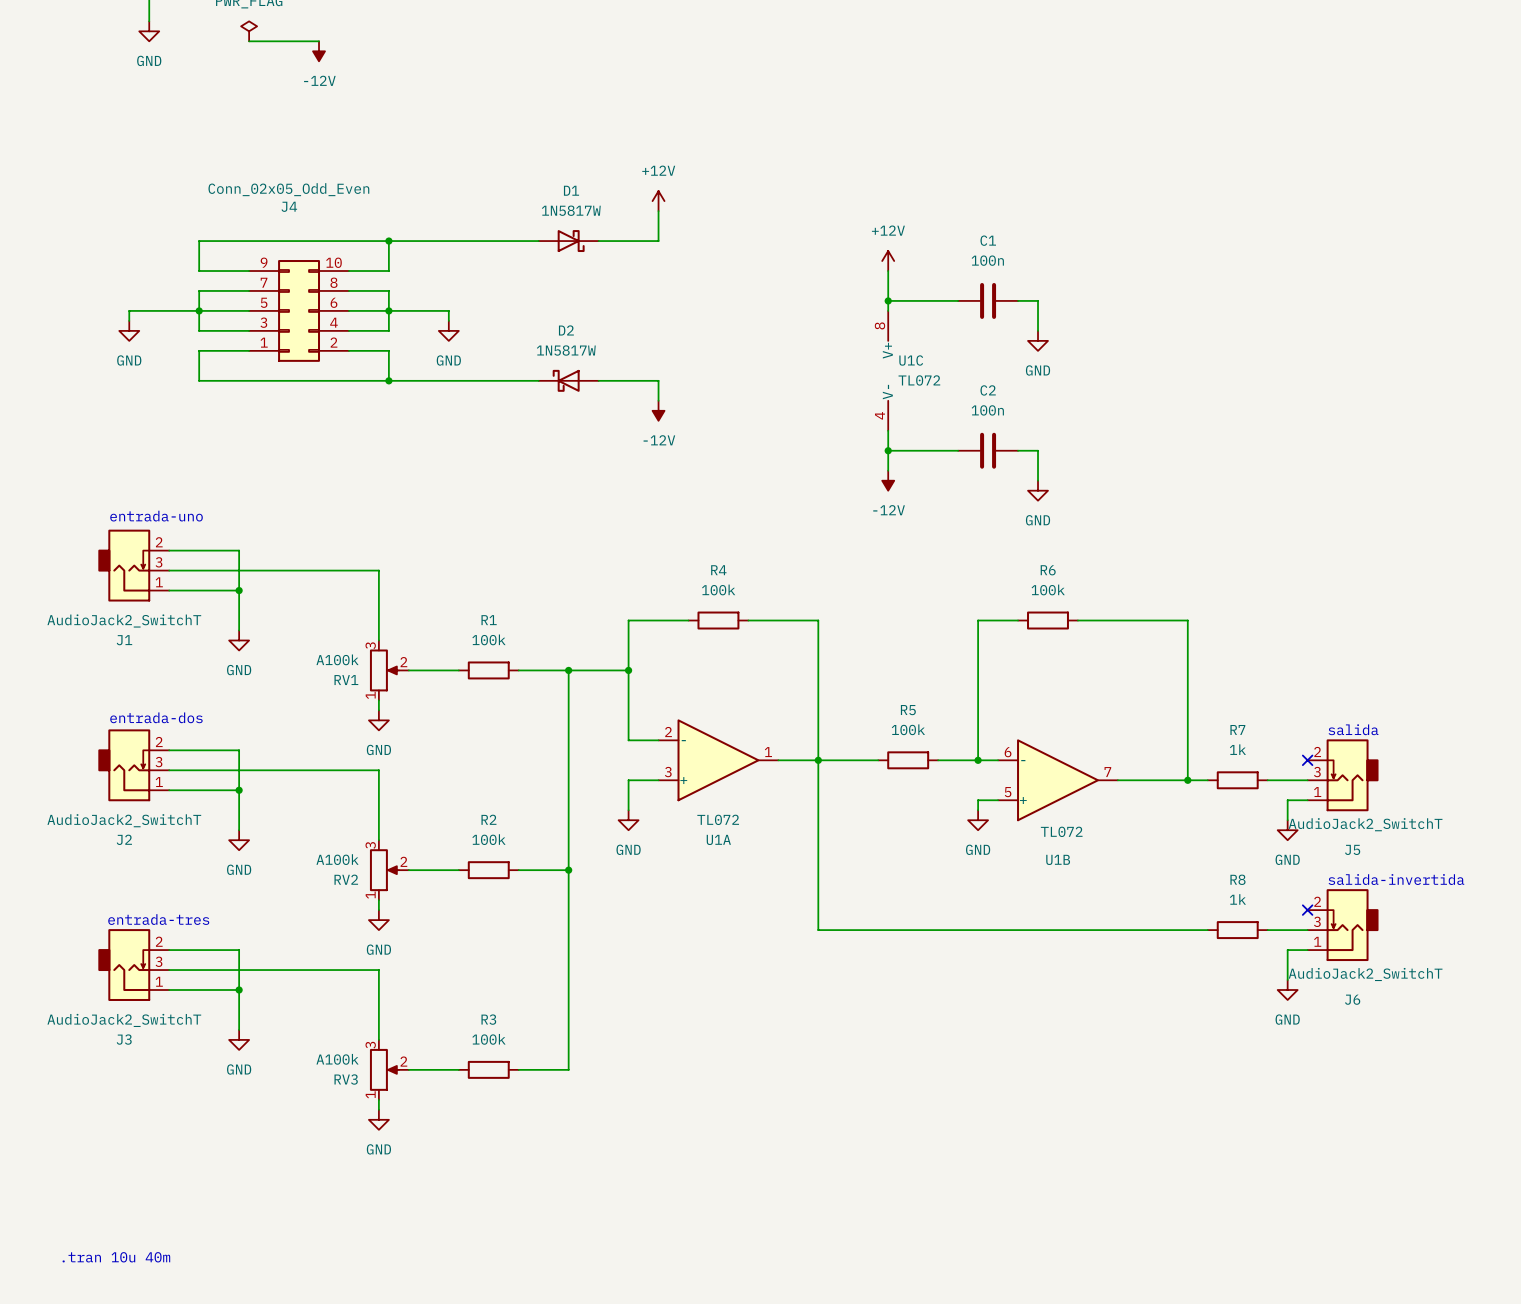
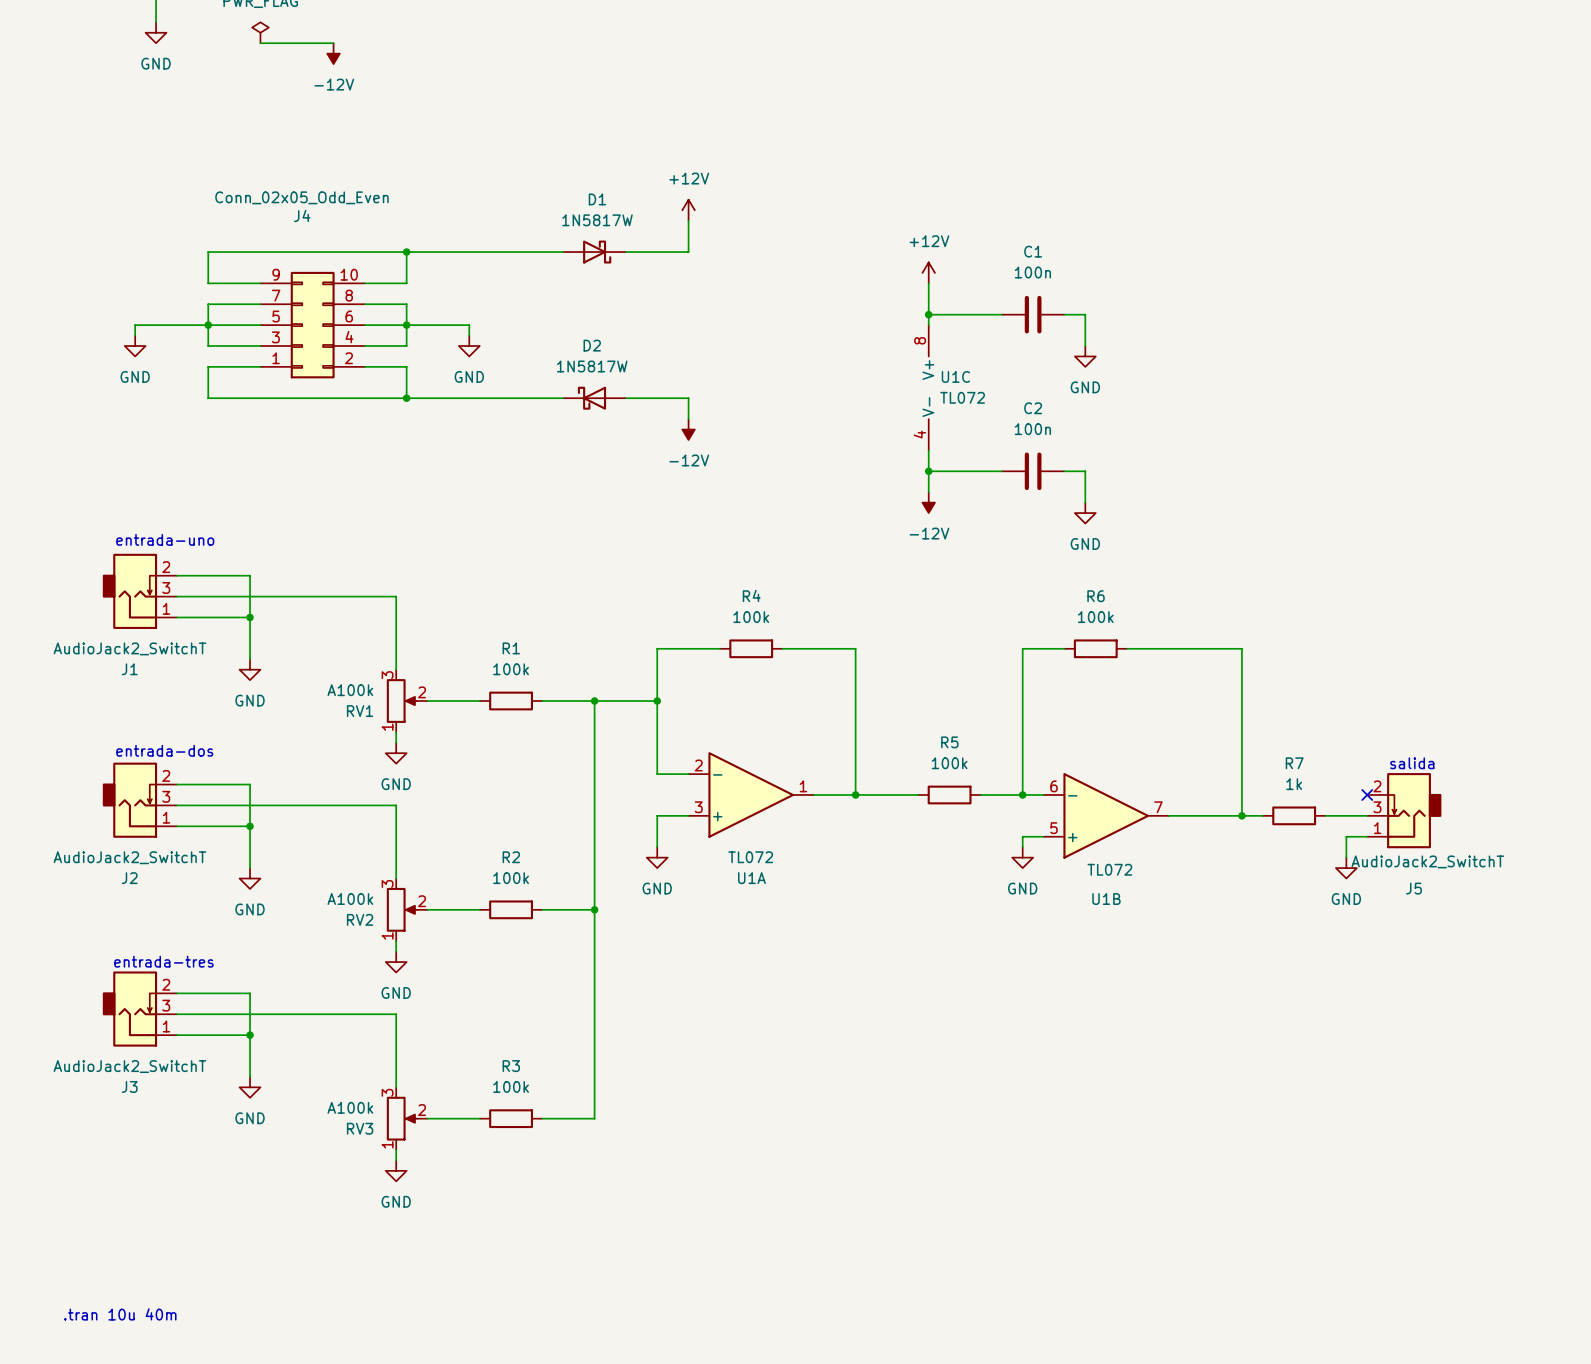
wire: (818, 760) (818, 930) (1207, 930) -> none
text: salida-invertida (1396, 879) -> none
no-connect mark: (1307, 910) -> none
J6: AudioJack2_SwitchT (1343, 925) -> none
R8: 1k (1237, 930) -> none
wire: (1267, 930) (1307, 930) -> none
wire: (1307, 950) (1287, 950) (1287, 980) -> none
power symbol: GND (1287, 990) -> none

